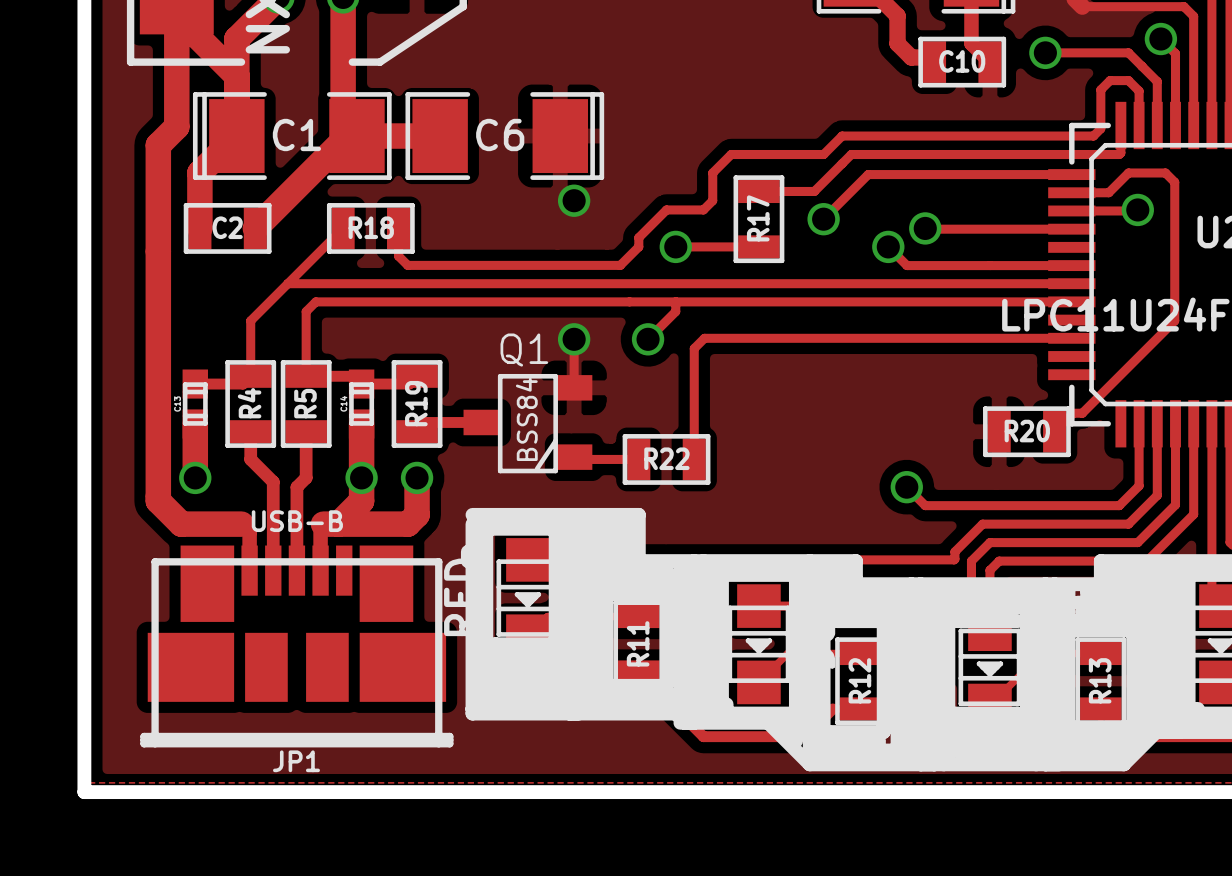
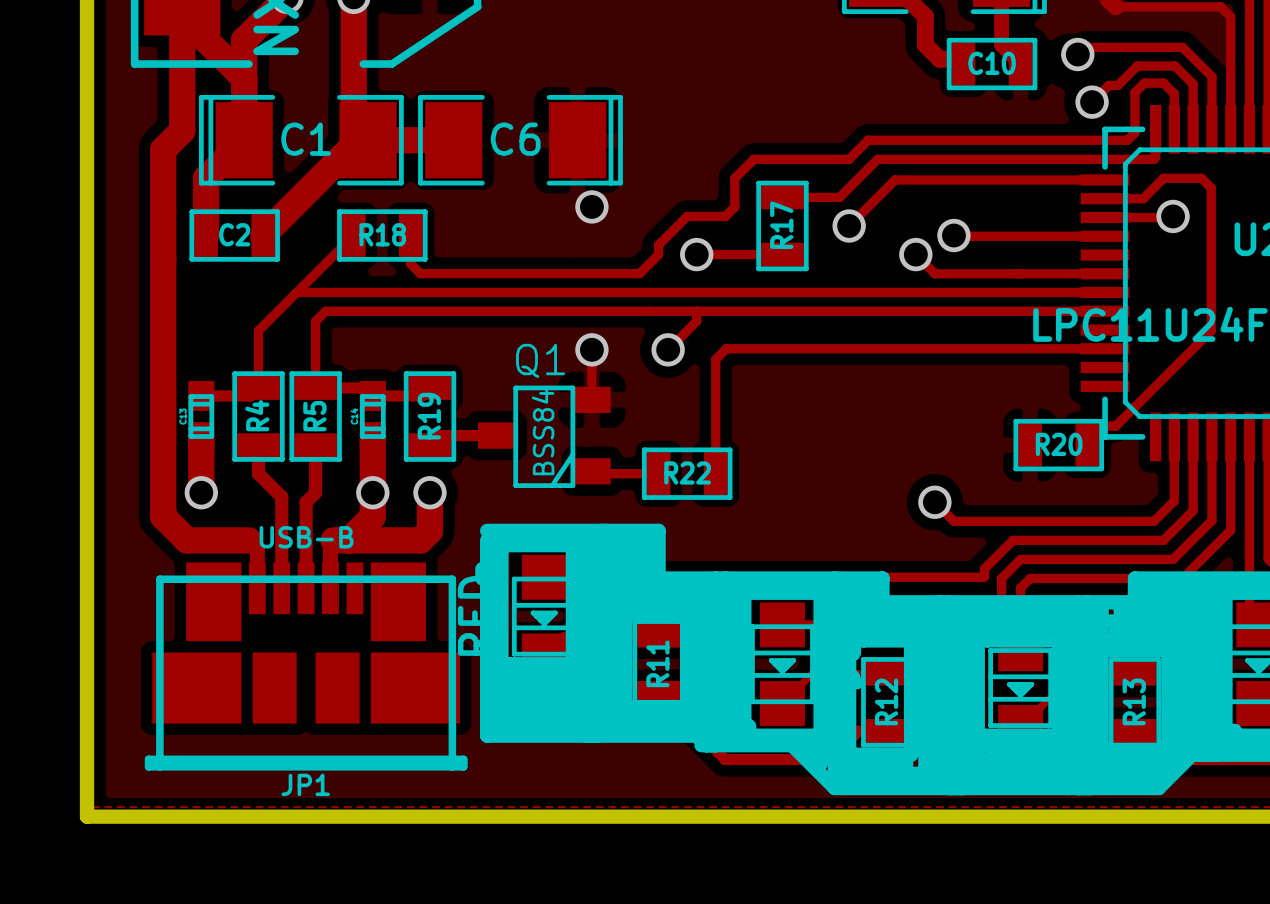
track: (1160, 39) (1175, 53) (1175, 74) -> (1070, 61) (1084, 47) (1182, 47) (1211, 76)
via: (1160, 39) -> none
track: (1045, 52) (1128, 52) (1139, 64) -> (1092, 102) (1108, 85) (1117, 85) (1137, 66) (1175, 66)
via: none -> (1092, 102)

